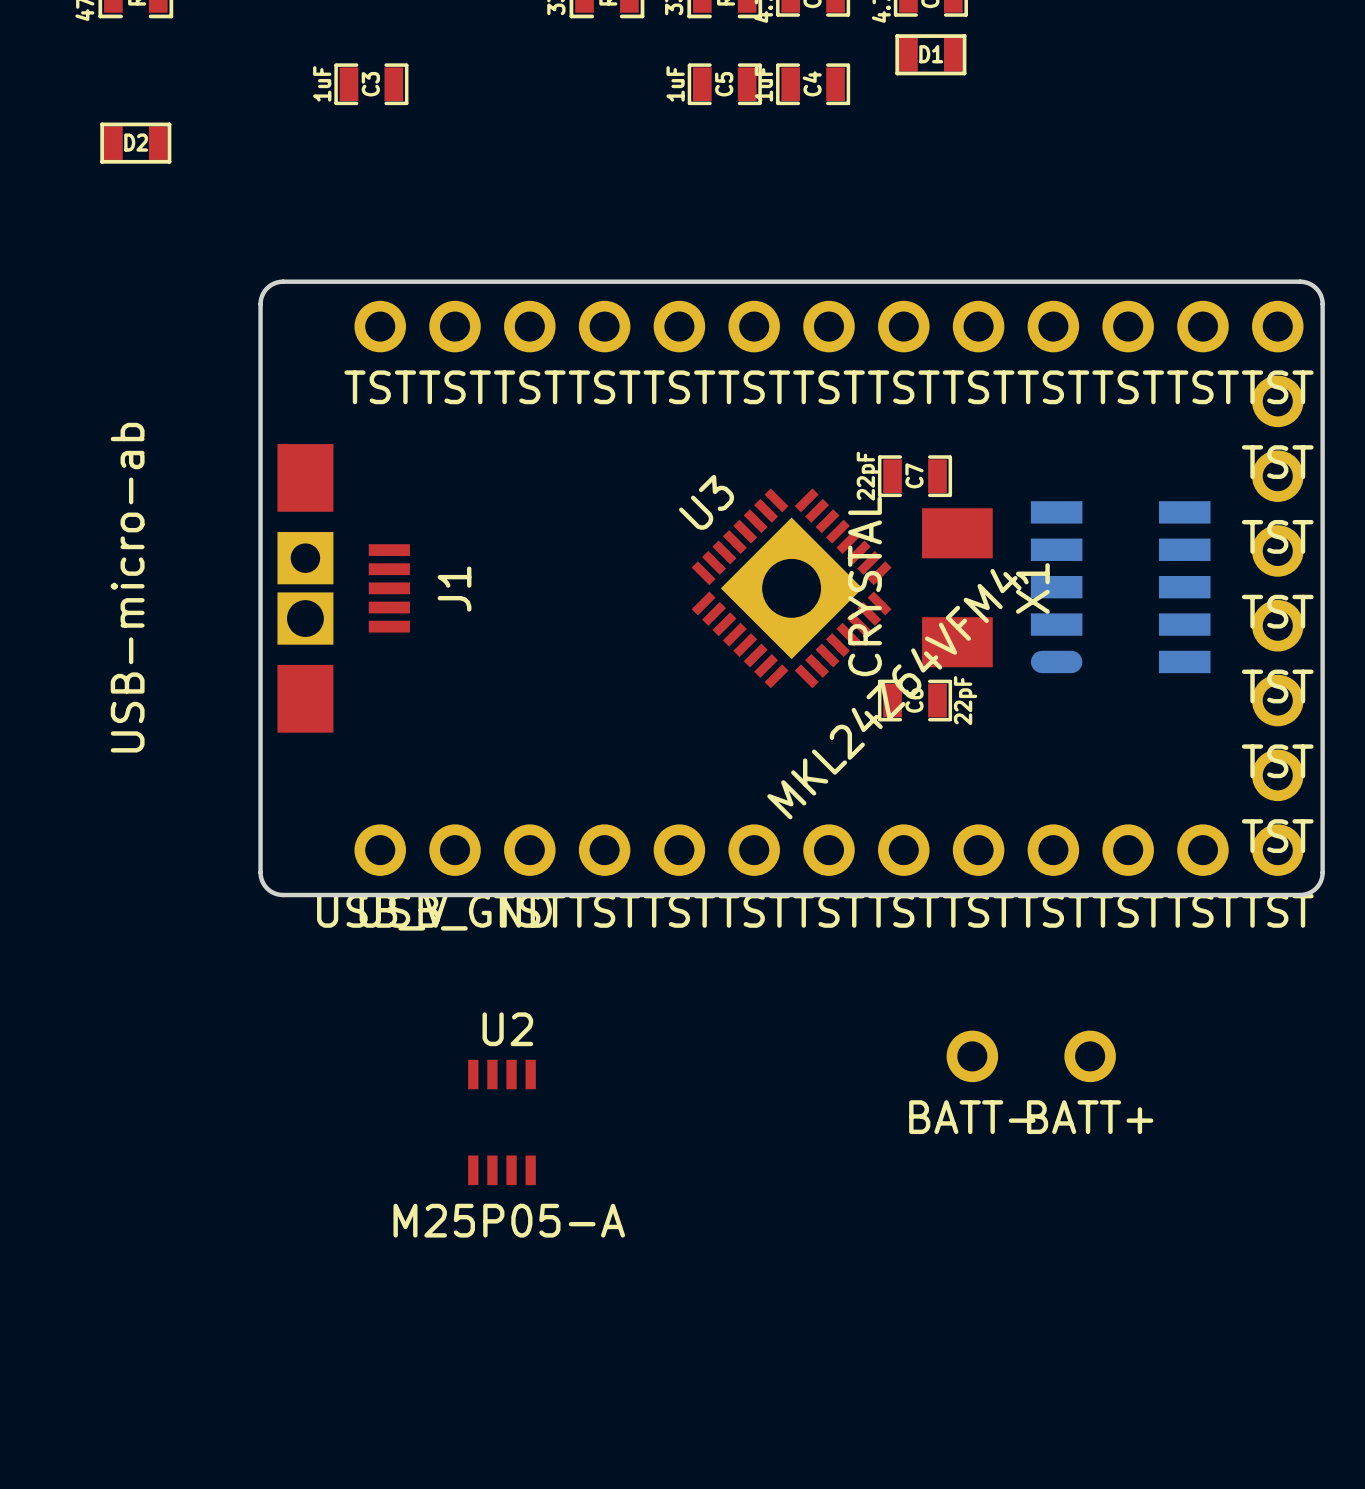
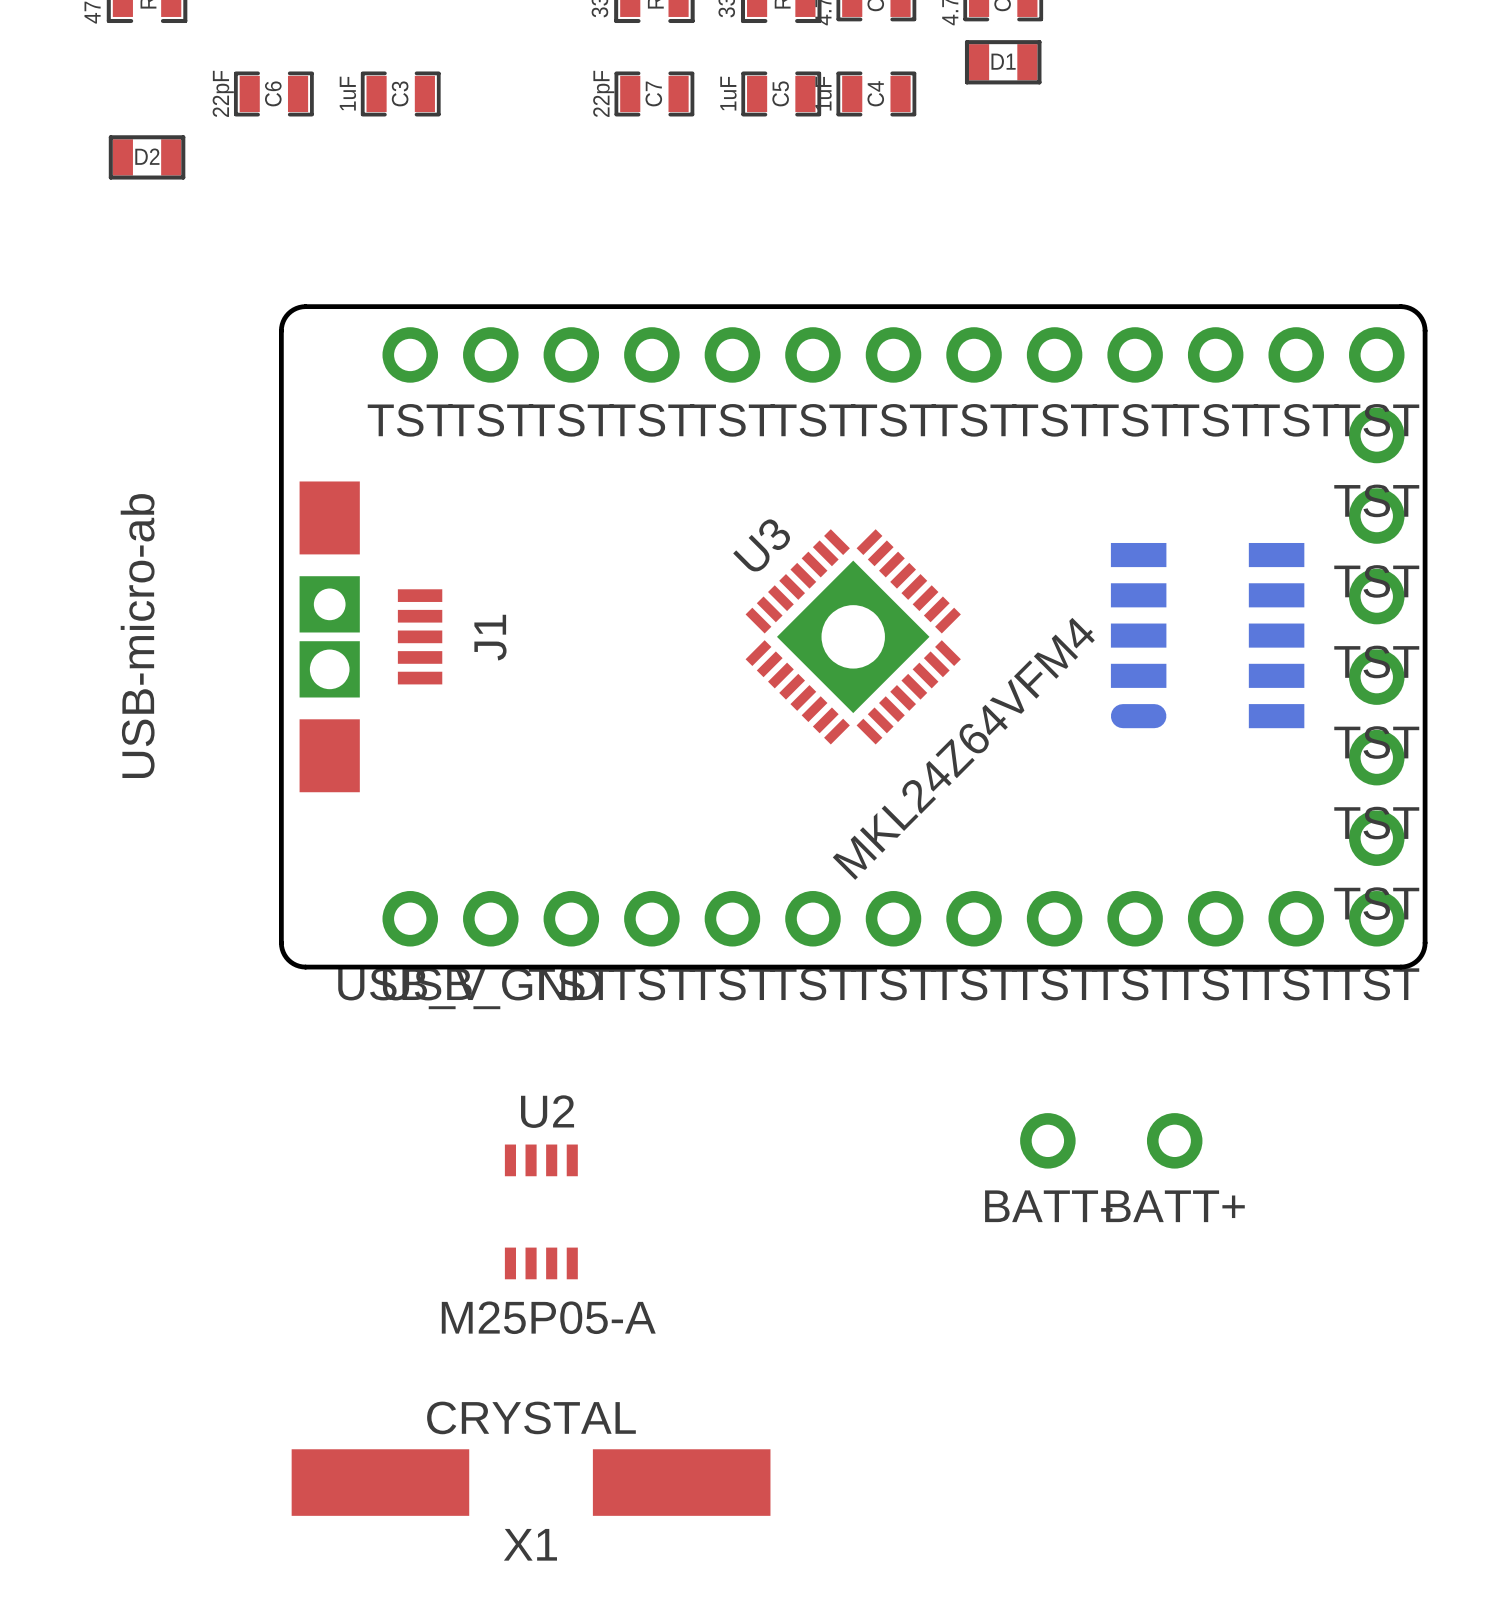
C7 position: (915, 476) -> (654, 93)
X1 footprint: [922, 508, 993, 668] -> [291, 1449, 771, 1516]
X1 value position: CRYSTAL (865, 586) -> CRYSTAL (531, 1417)
X1 name position: X1 (1032, 588) -> X1 (530, 1544)
C6 position: (915, 700) -> (273, 93)
C6 value position: 22pF (965, 700) -> 22pF (223, 93)

